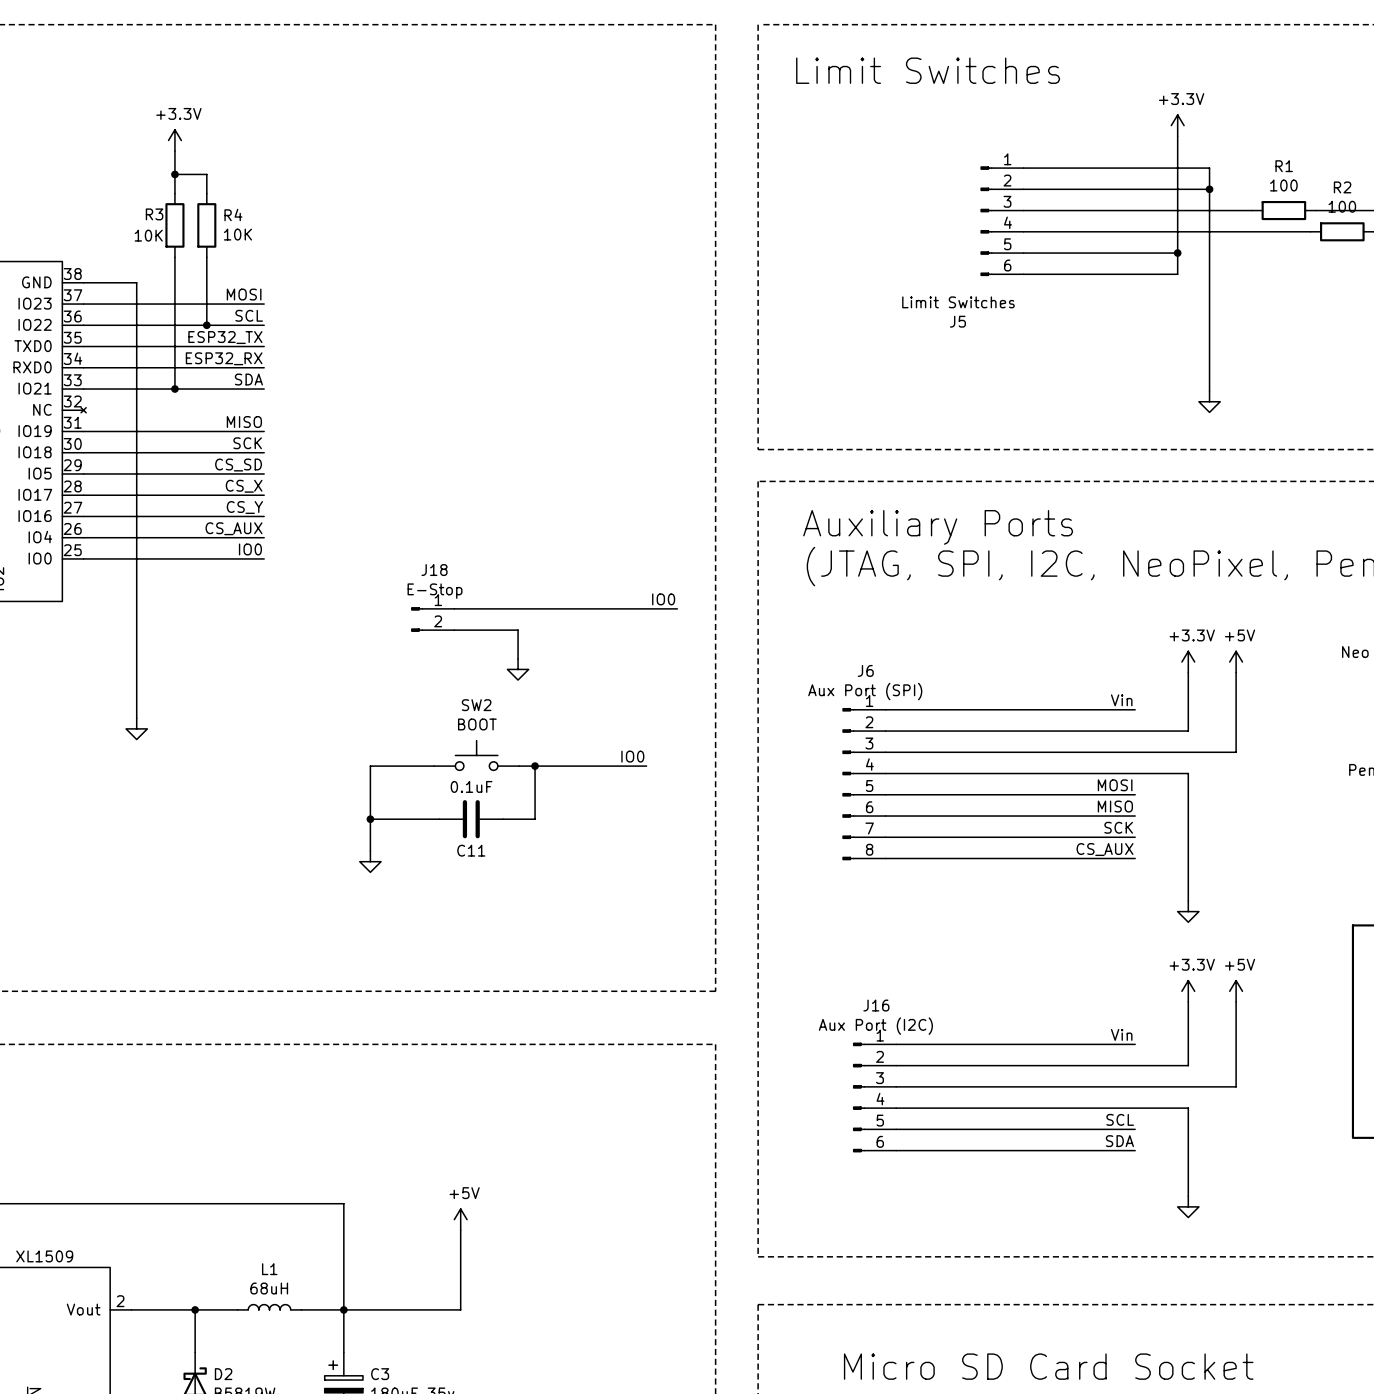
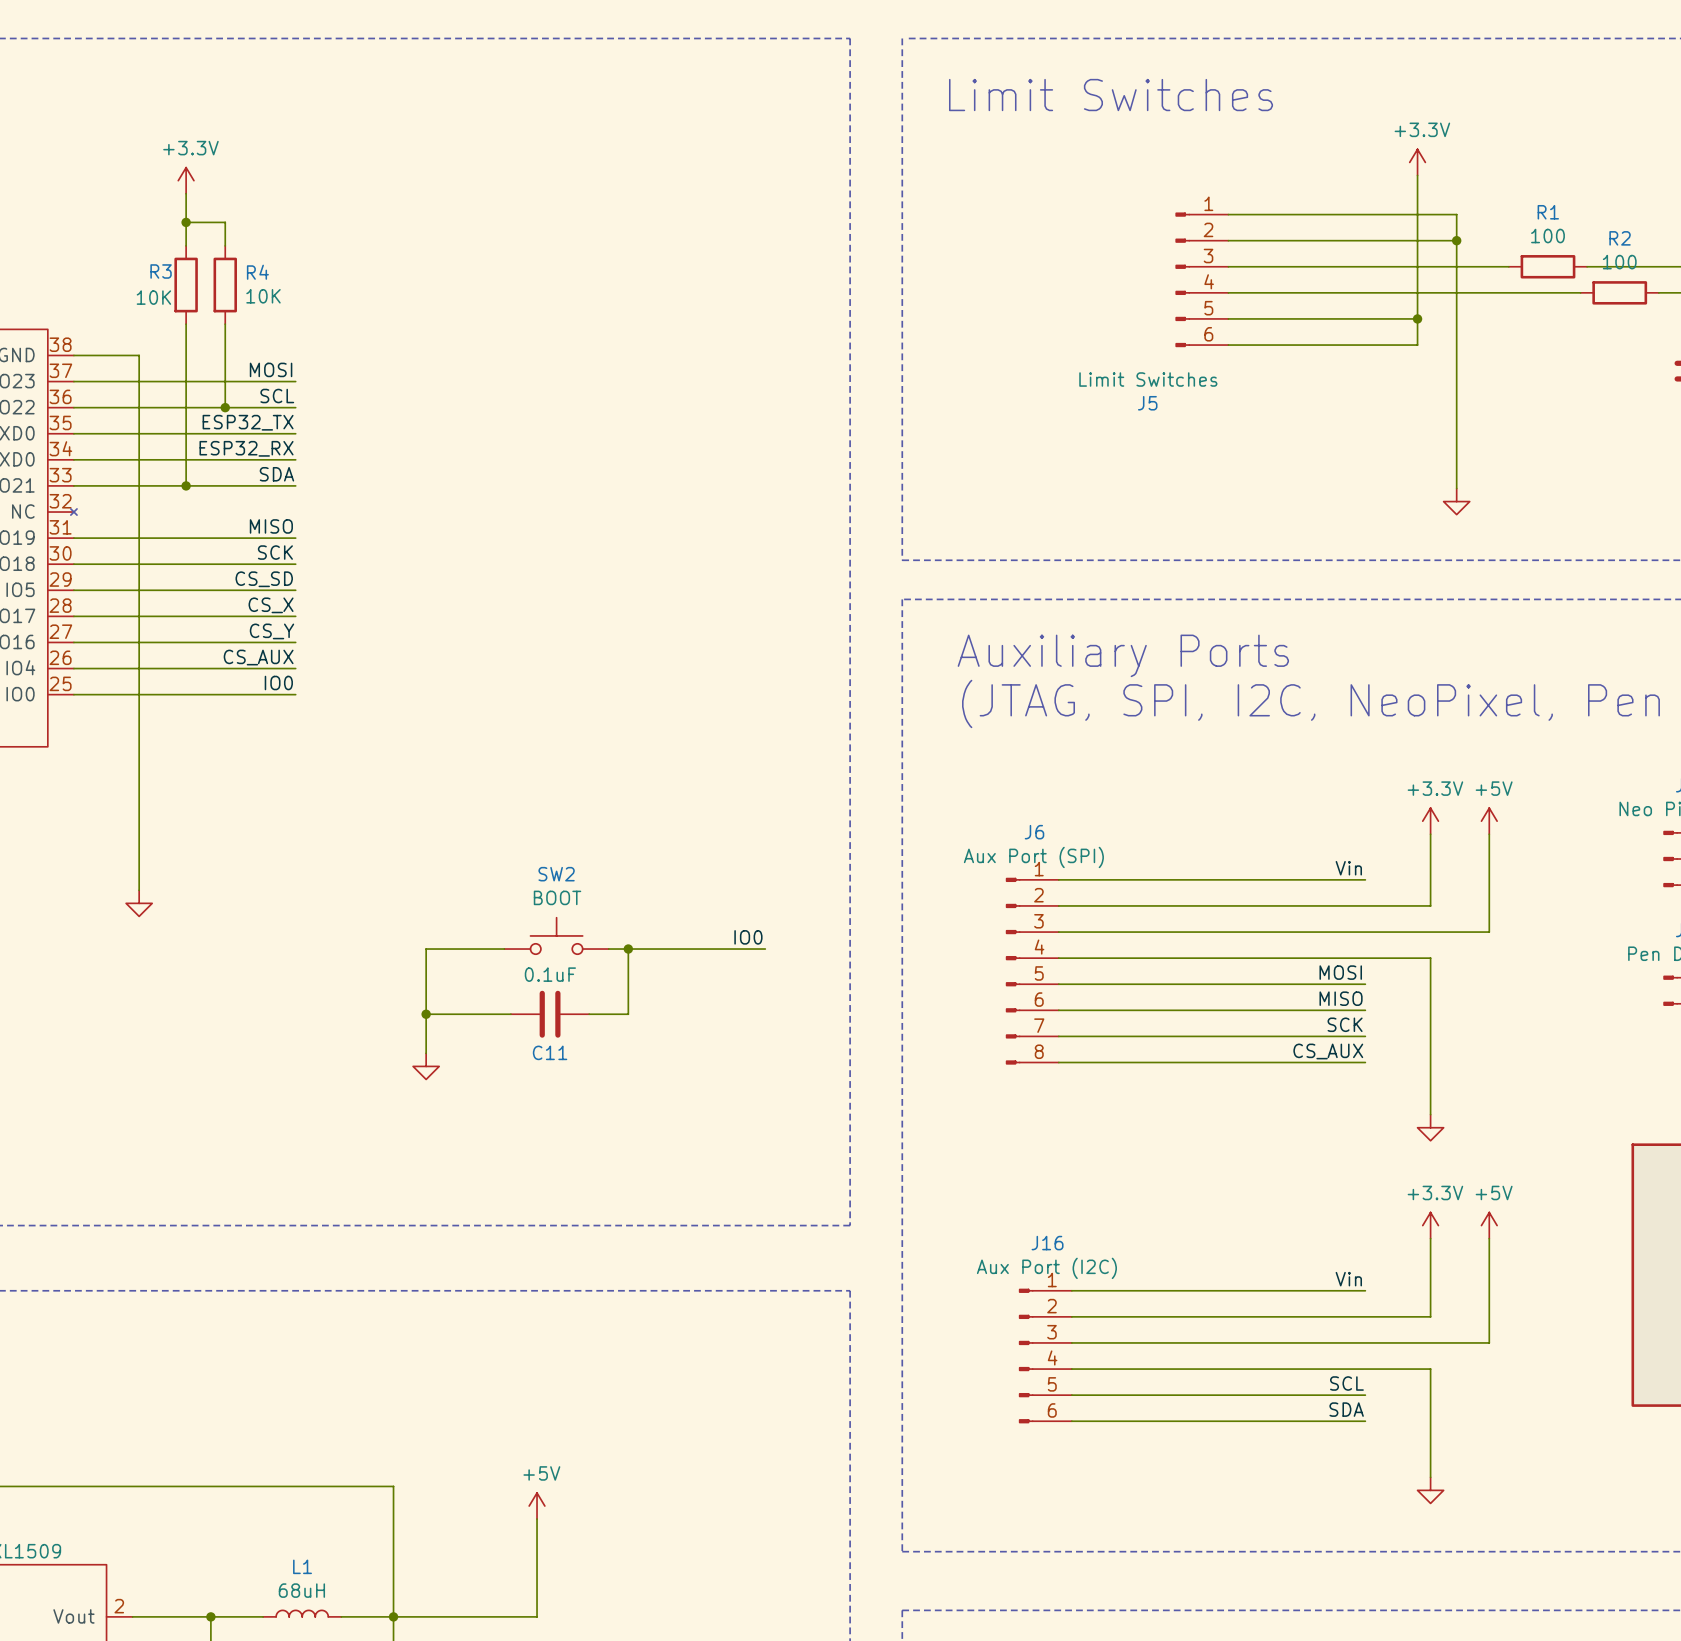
label: IO0 (663, 599) -> none
wire: (454, 608) (677, 608) -> none
J18: E-Stop (432, 619) -> none
wire: (454, 630) (518, 630) (518, 658) -> none
power symbol: (518, 669) -> none

